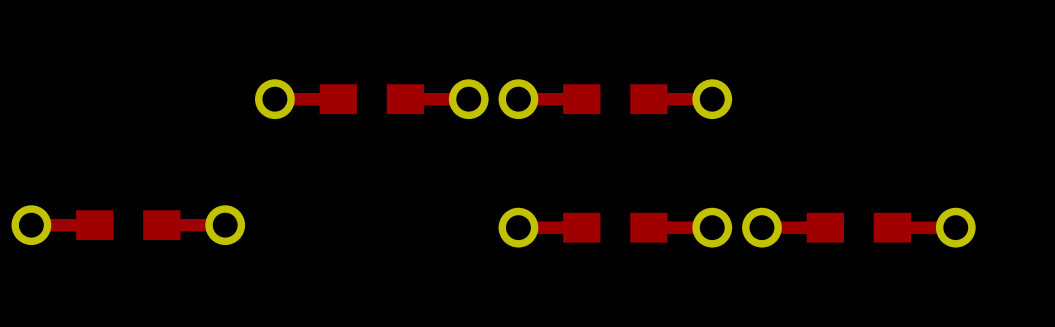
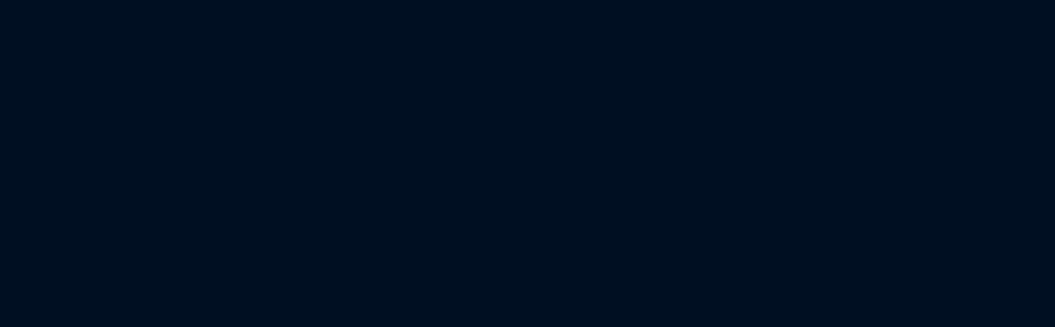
part: (371, 99) -> none
part: (615, 99) -> none
part: (128, 225) -> none
part: (615, 227) -> none
part: (858, 227) -> none

